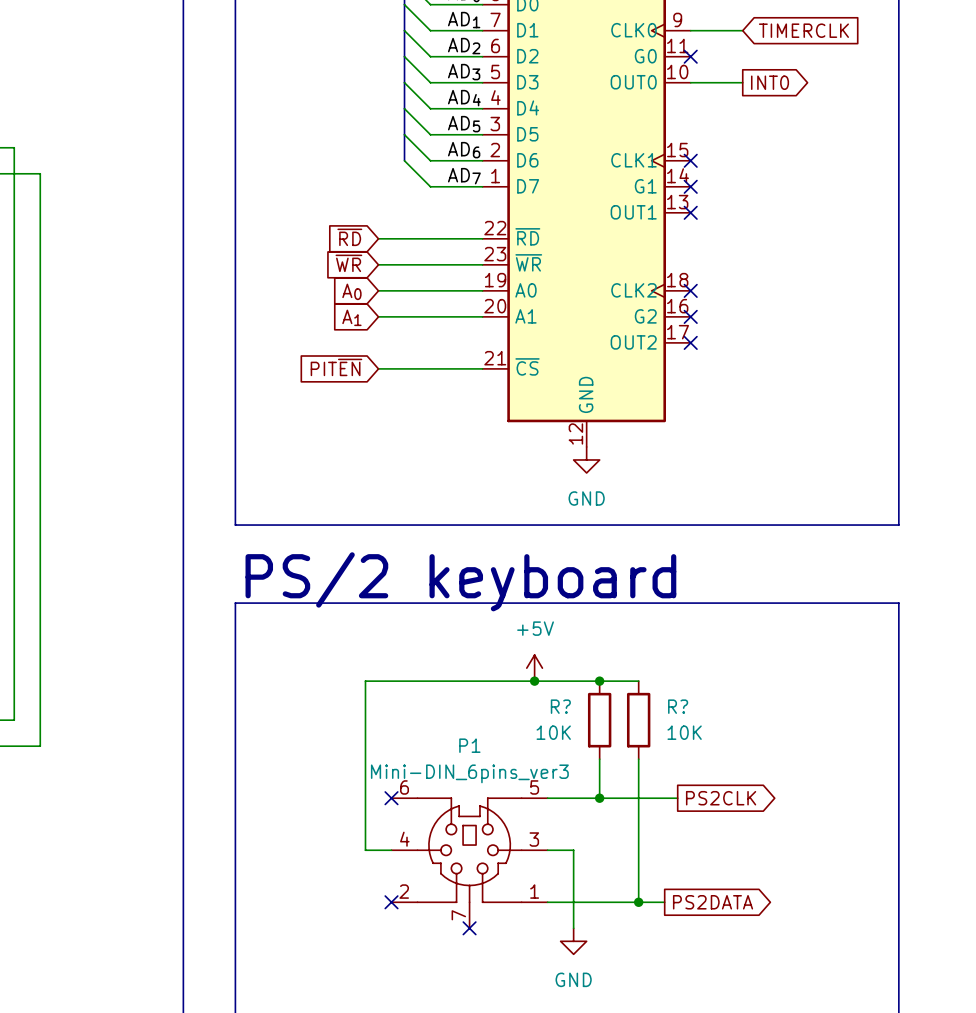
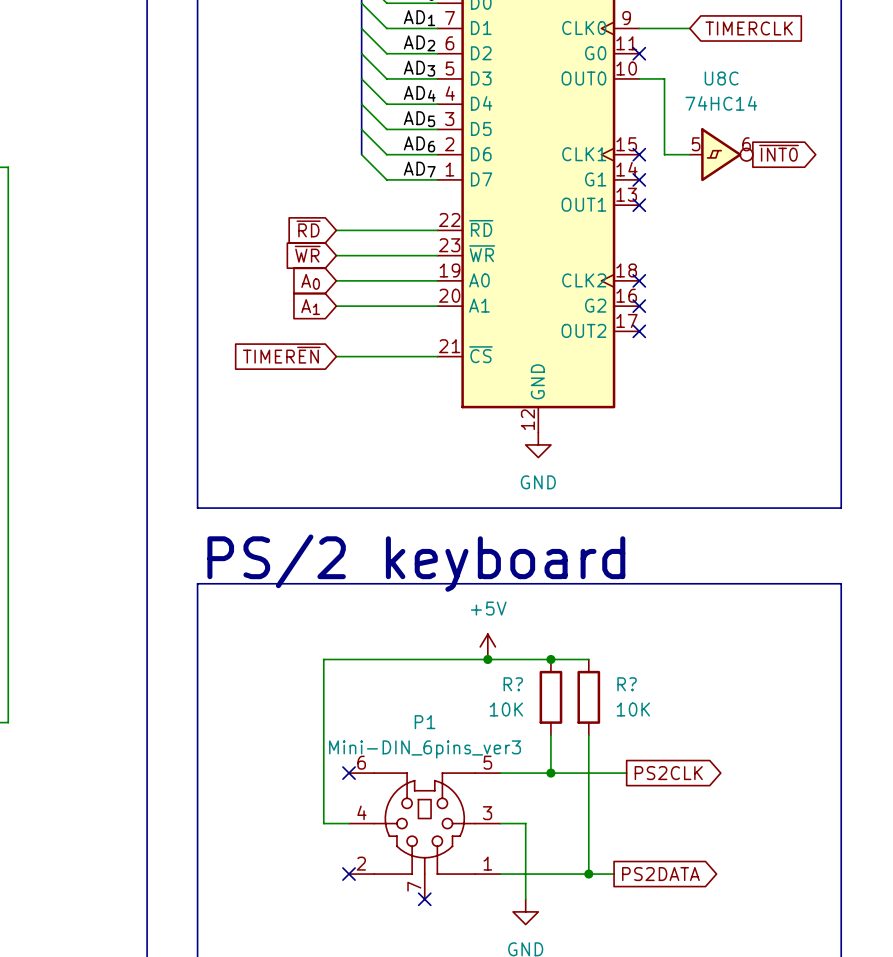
wire: (716, 82) (742, 82) -> (664, 78) (664, 154) (689, 154)
global label: INT0 (770, 82) -> none
global label: none -> ~{INT0} (779, 153)
U8C: none -> 74HC14 (721, 154)
global label: PIT~{EN} (336, 367) -> TIMER~{EN} (281, 355)

